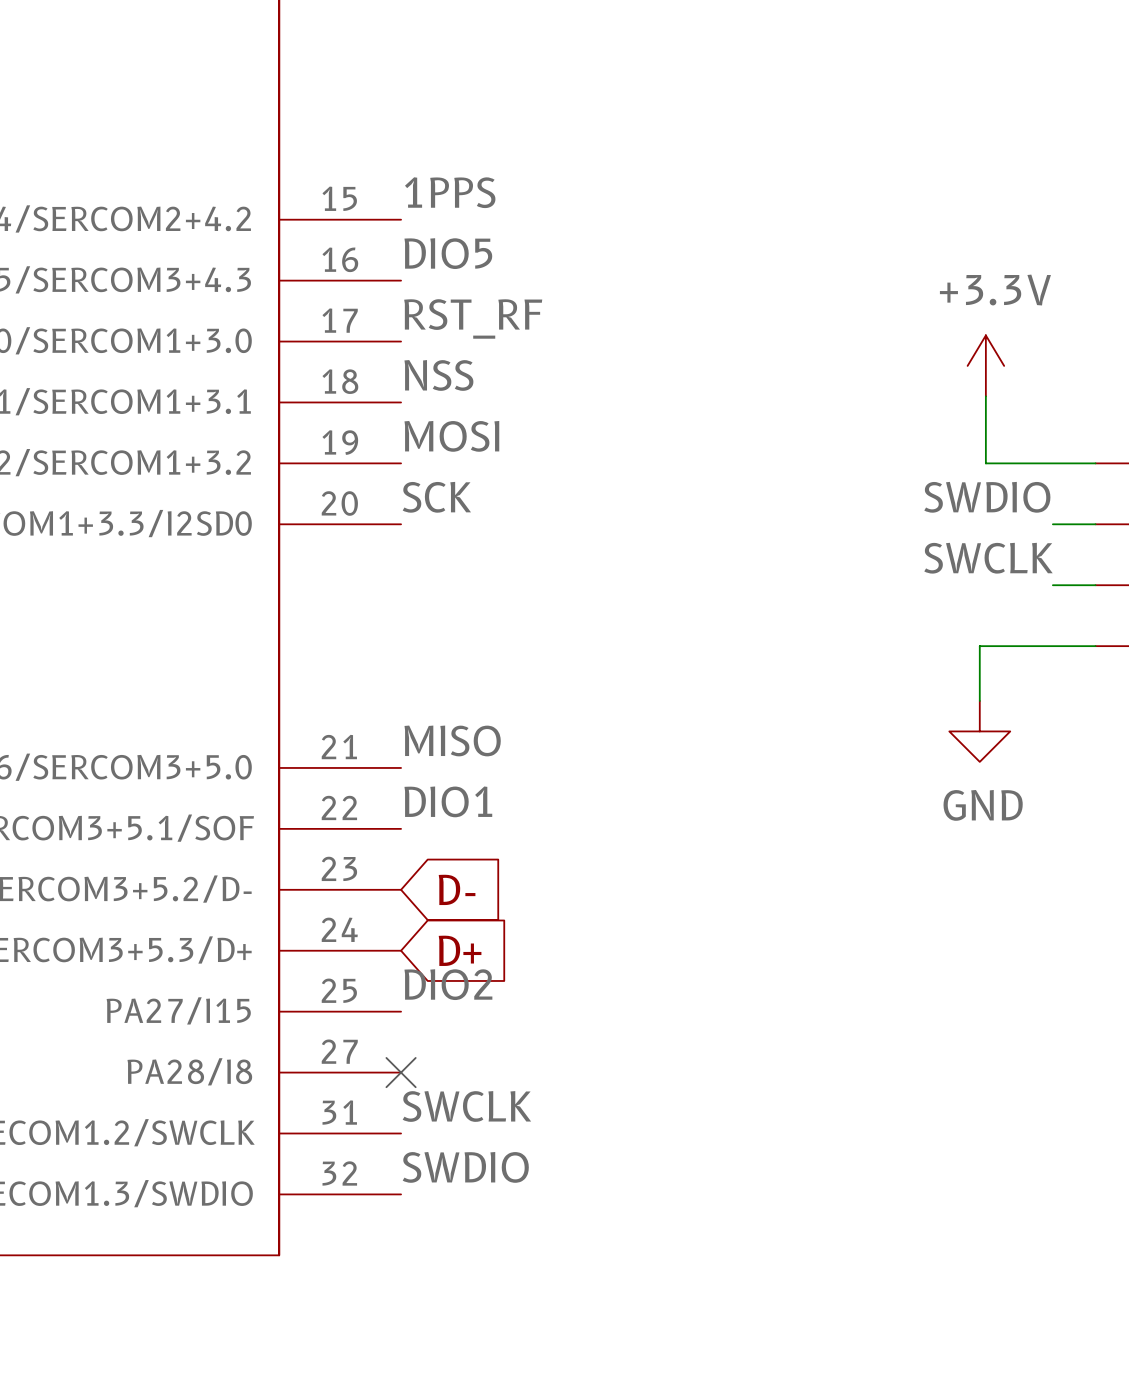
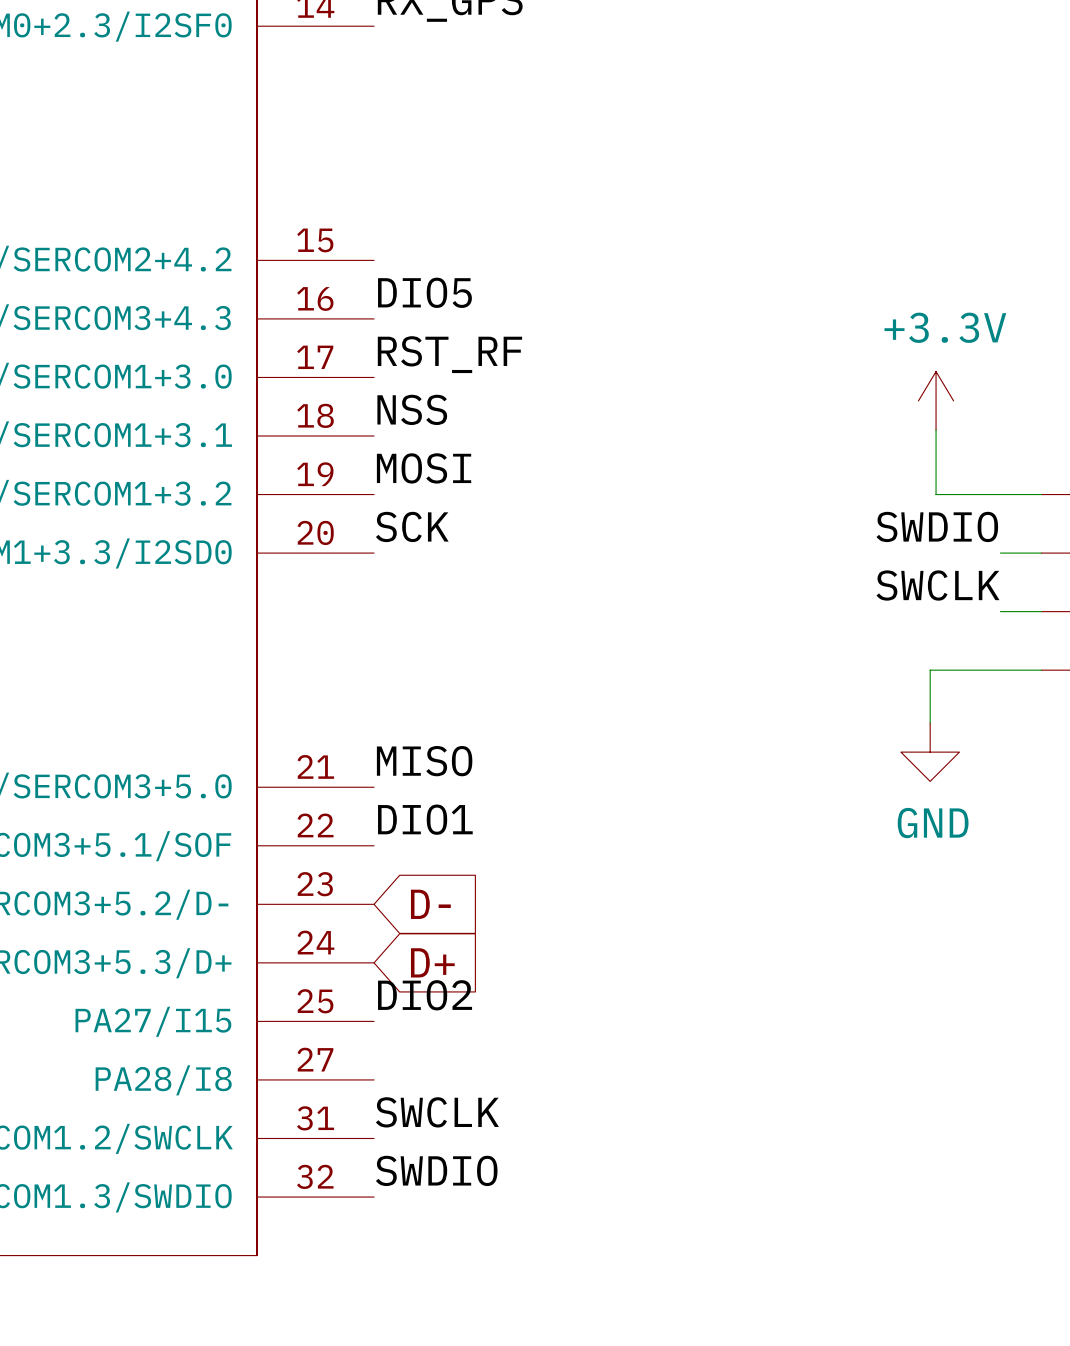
label: 1PPS (450, 192) -> none
no-connect mark: (401, 1072) -> none

